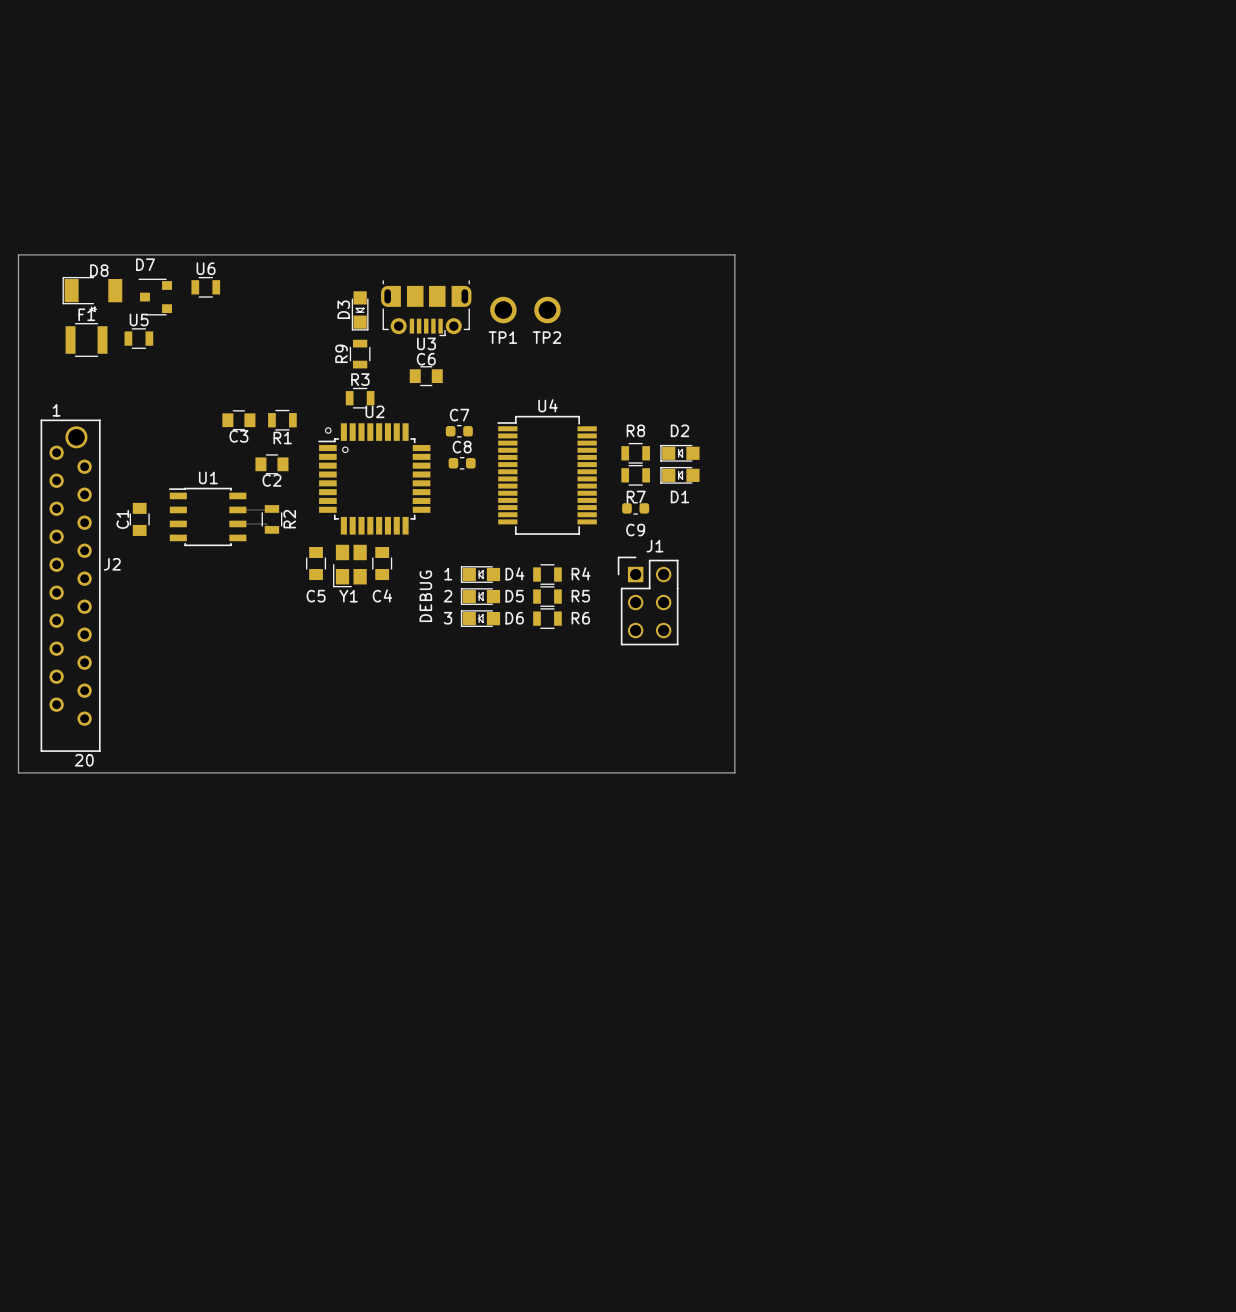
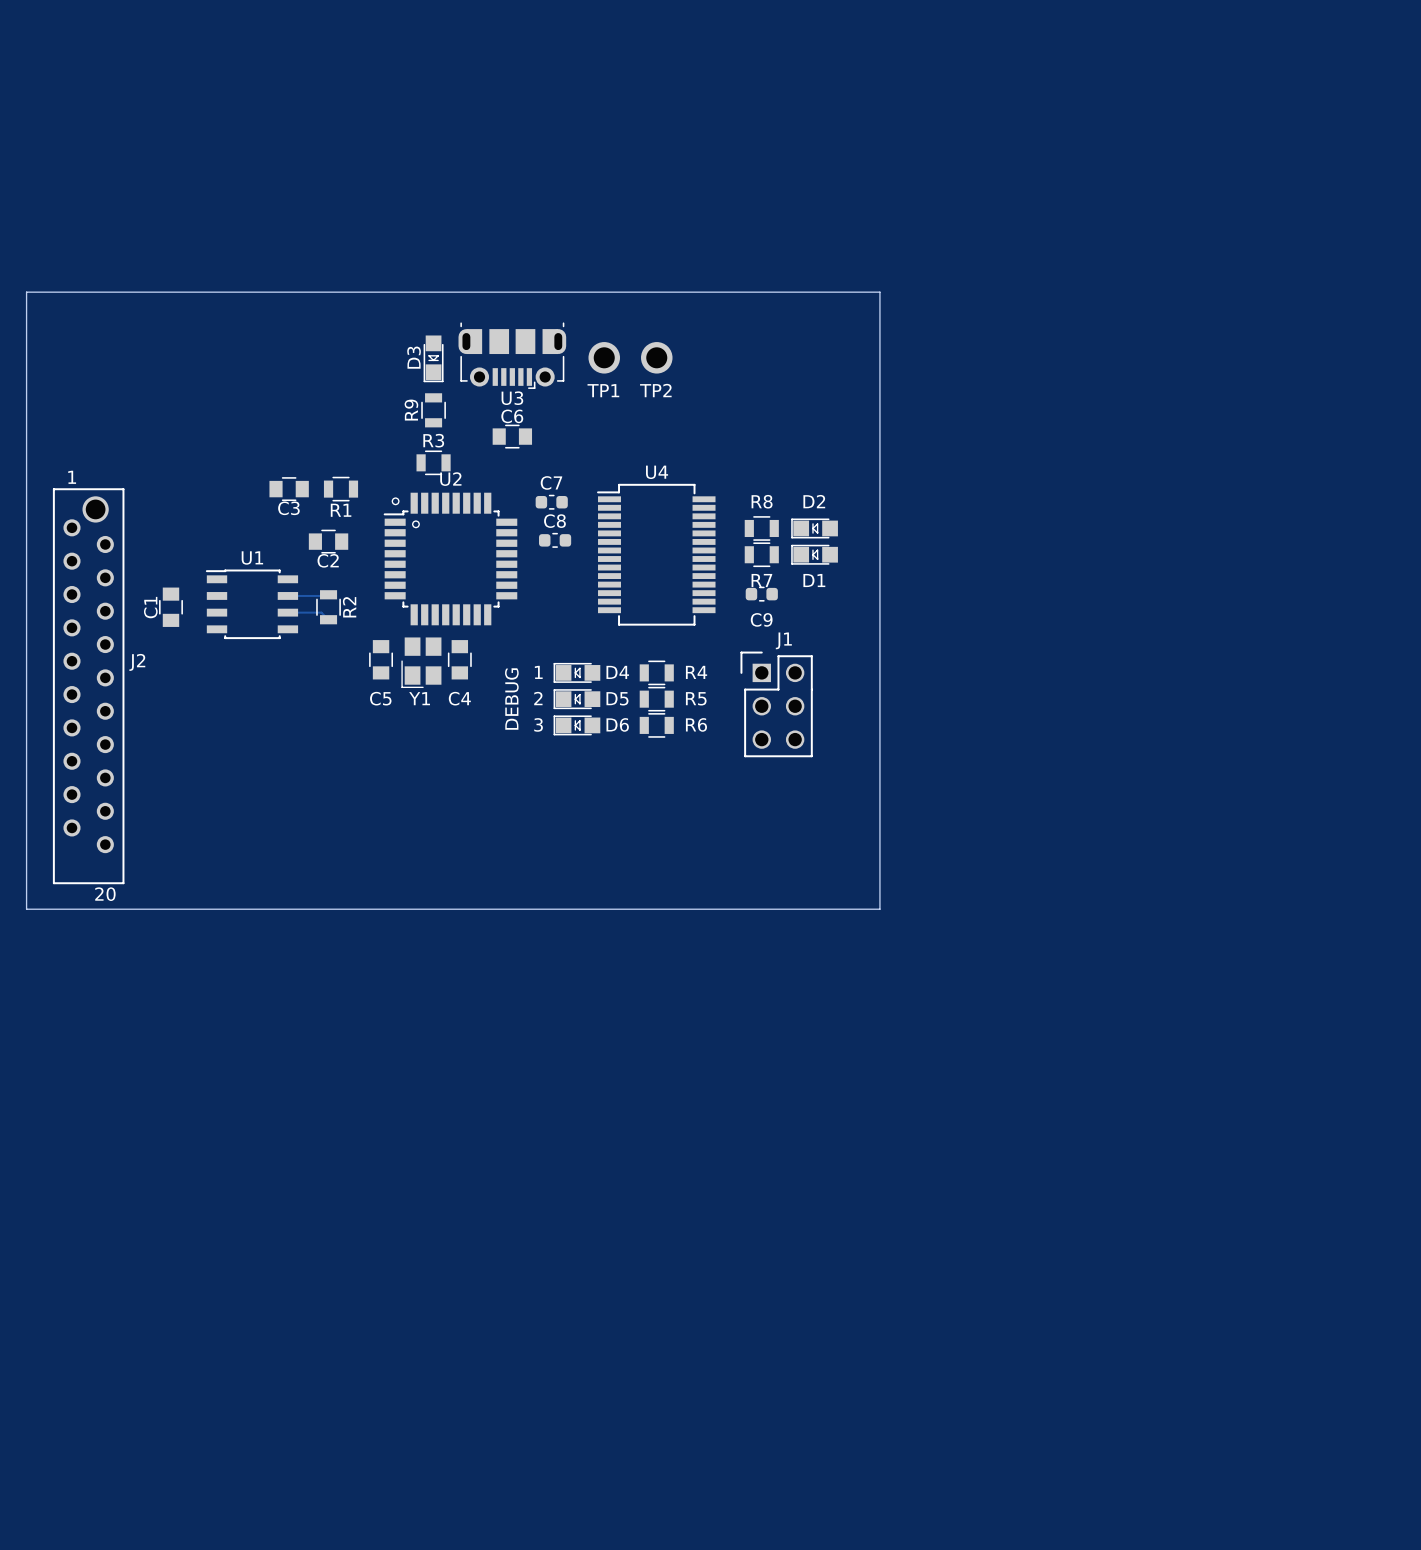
U6: (205, 287) -> none
D8: (92, 294) -> none
D7: (155, 297) -> none
U5: (138, 338) -> none
F1: (86, 340) -> none

